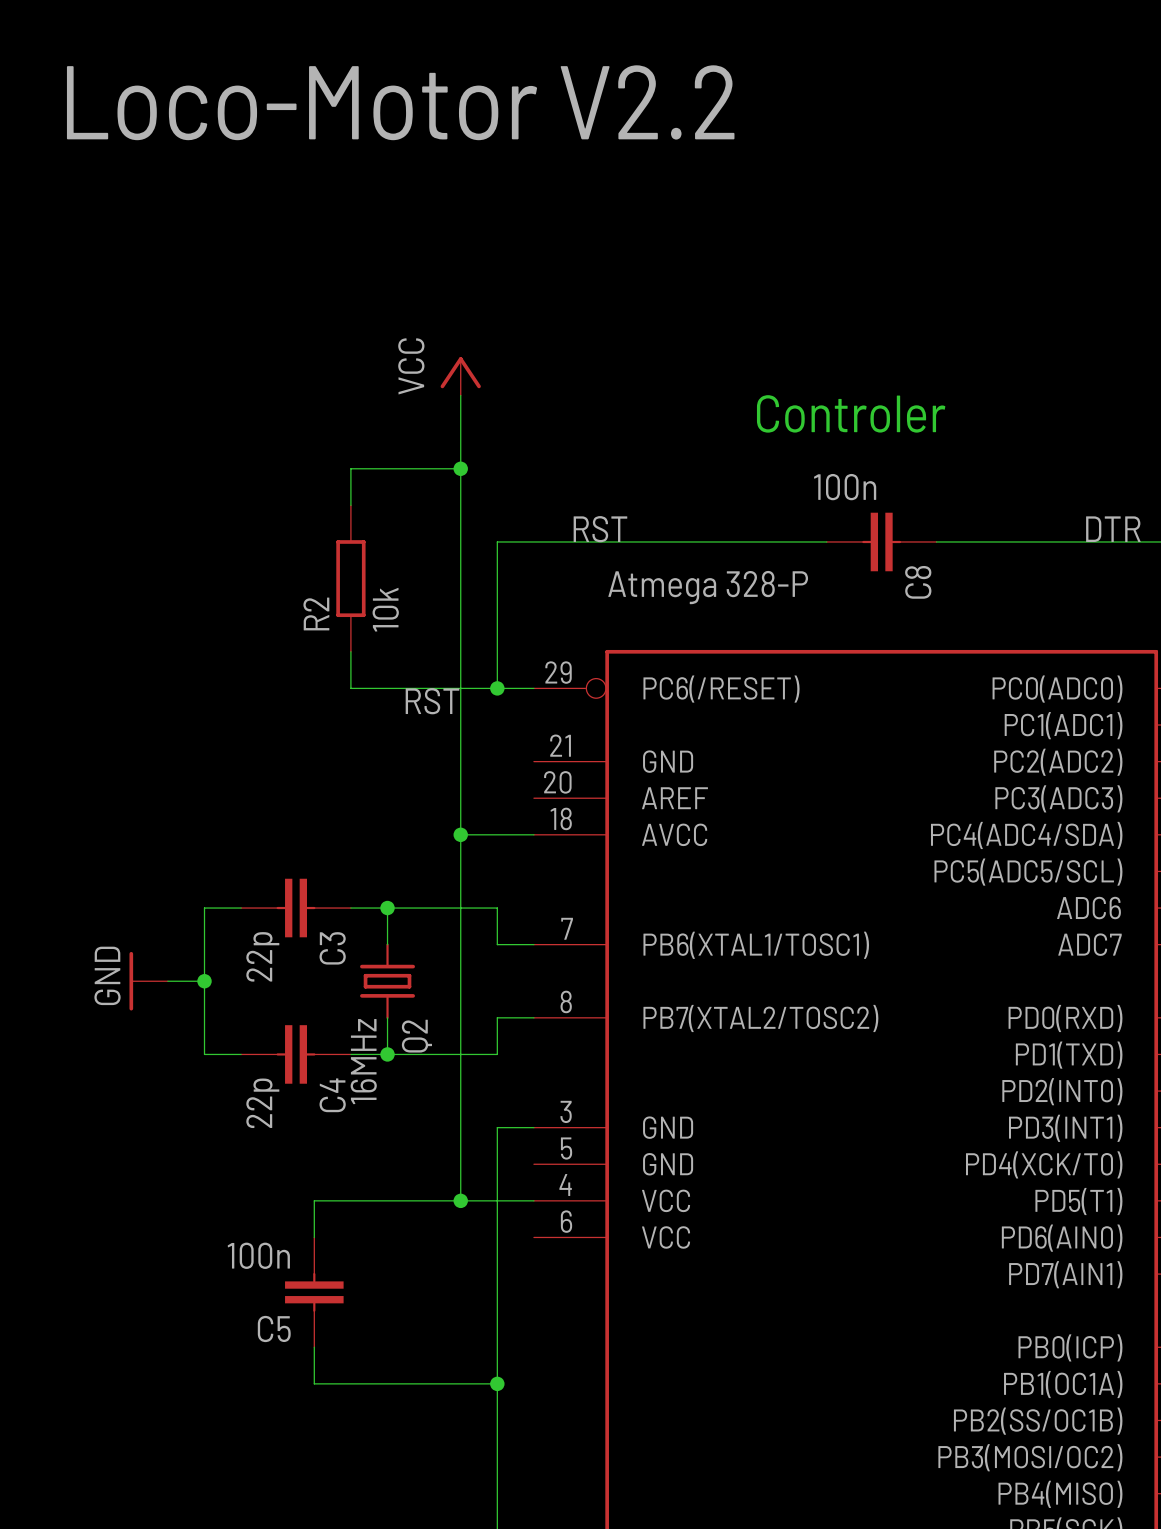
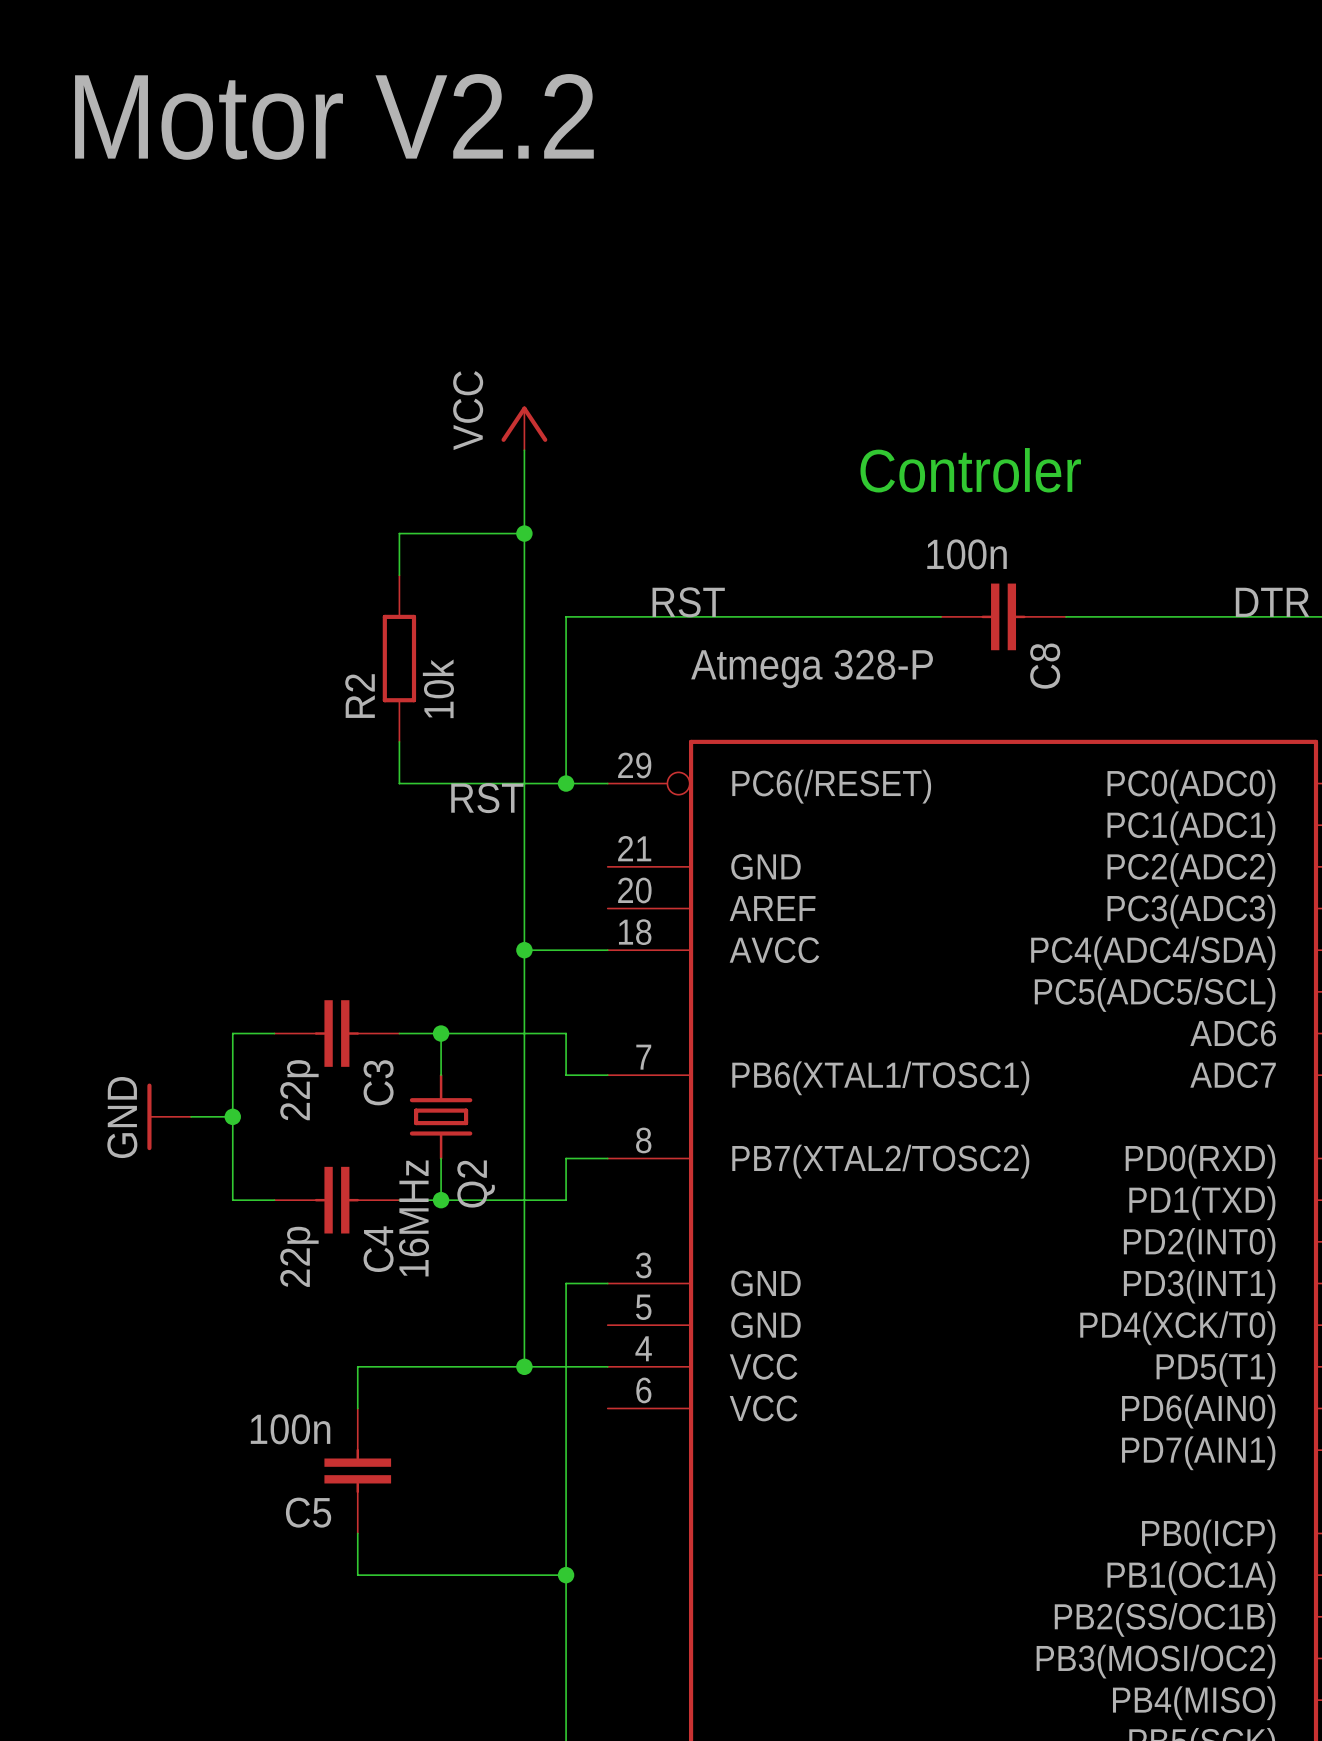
text: Loco-Motor V2.2 (400, 102) -> Motor V2.2 (334, 116)

